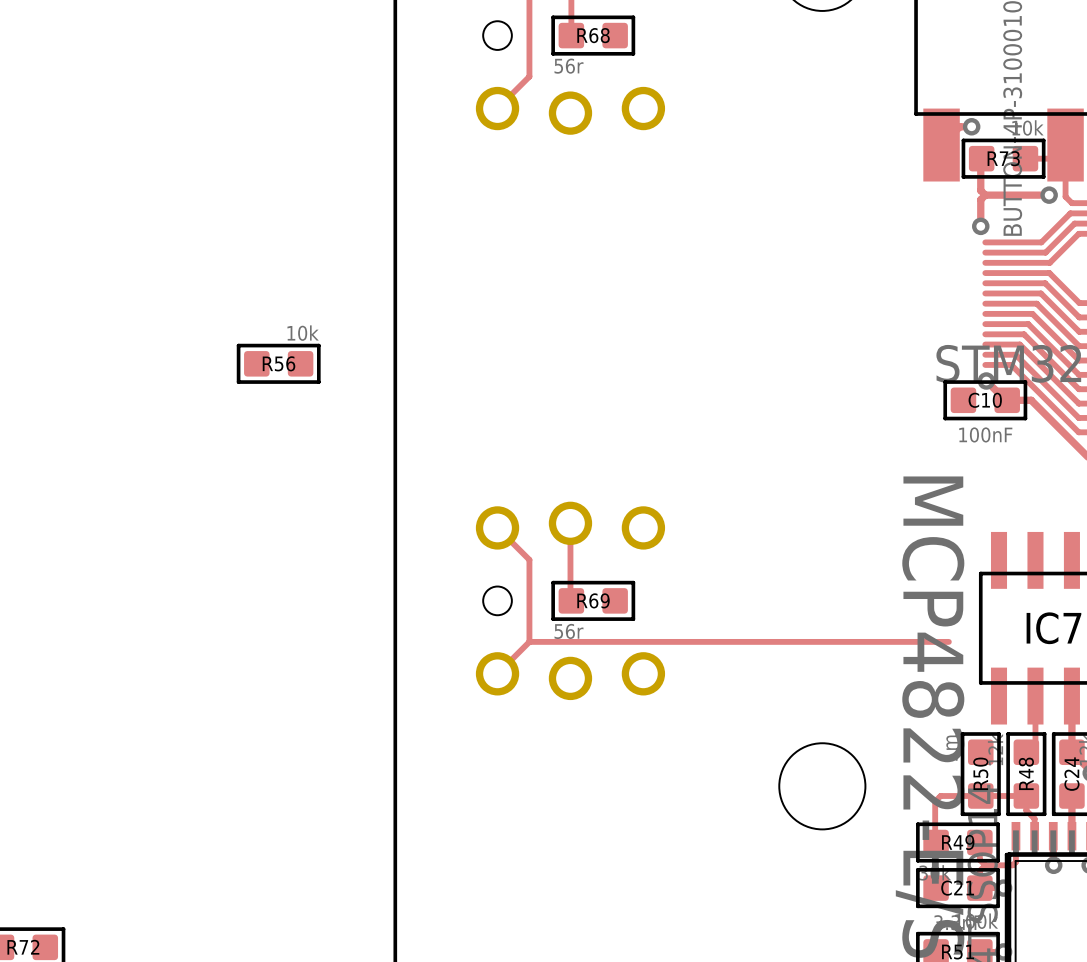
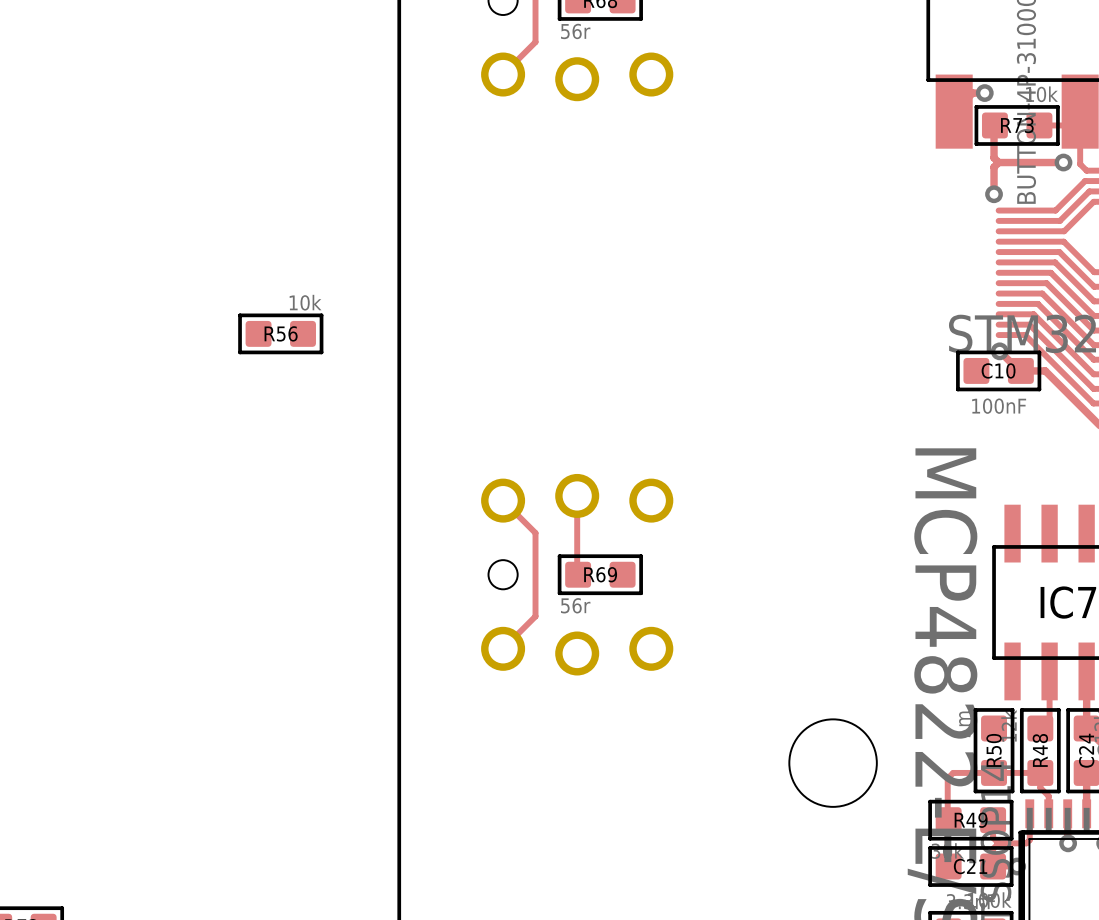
track: (529, 641) (948, 641) -> none

